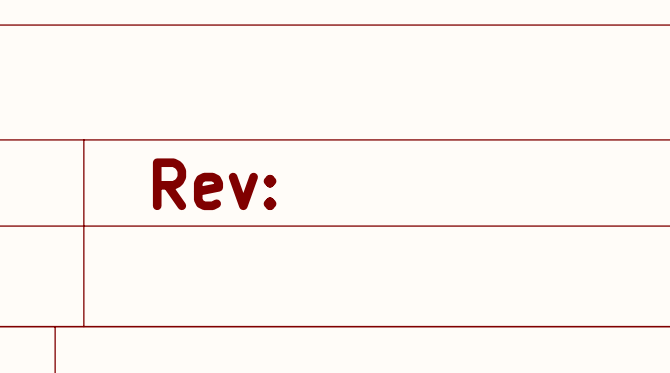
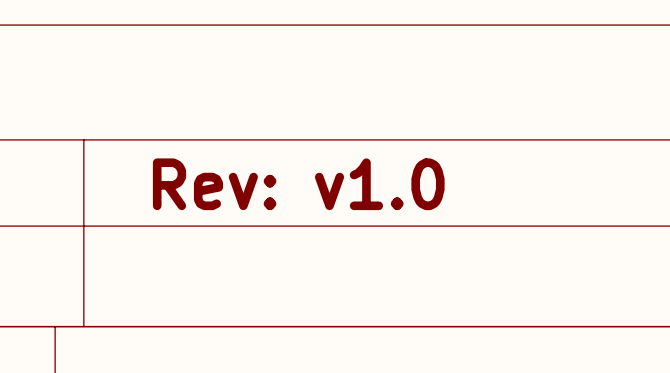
title block: Rev: (214, 184) -> Rev: v1.0 (298, 184)

